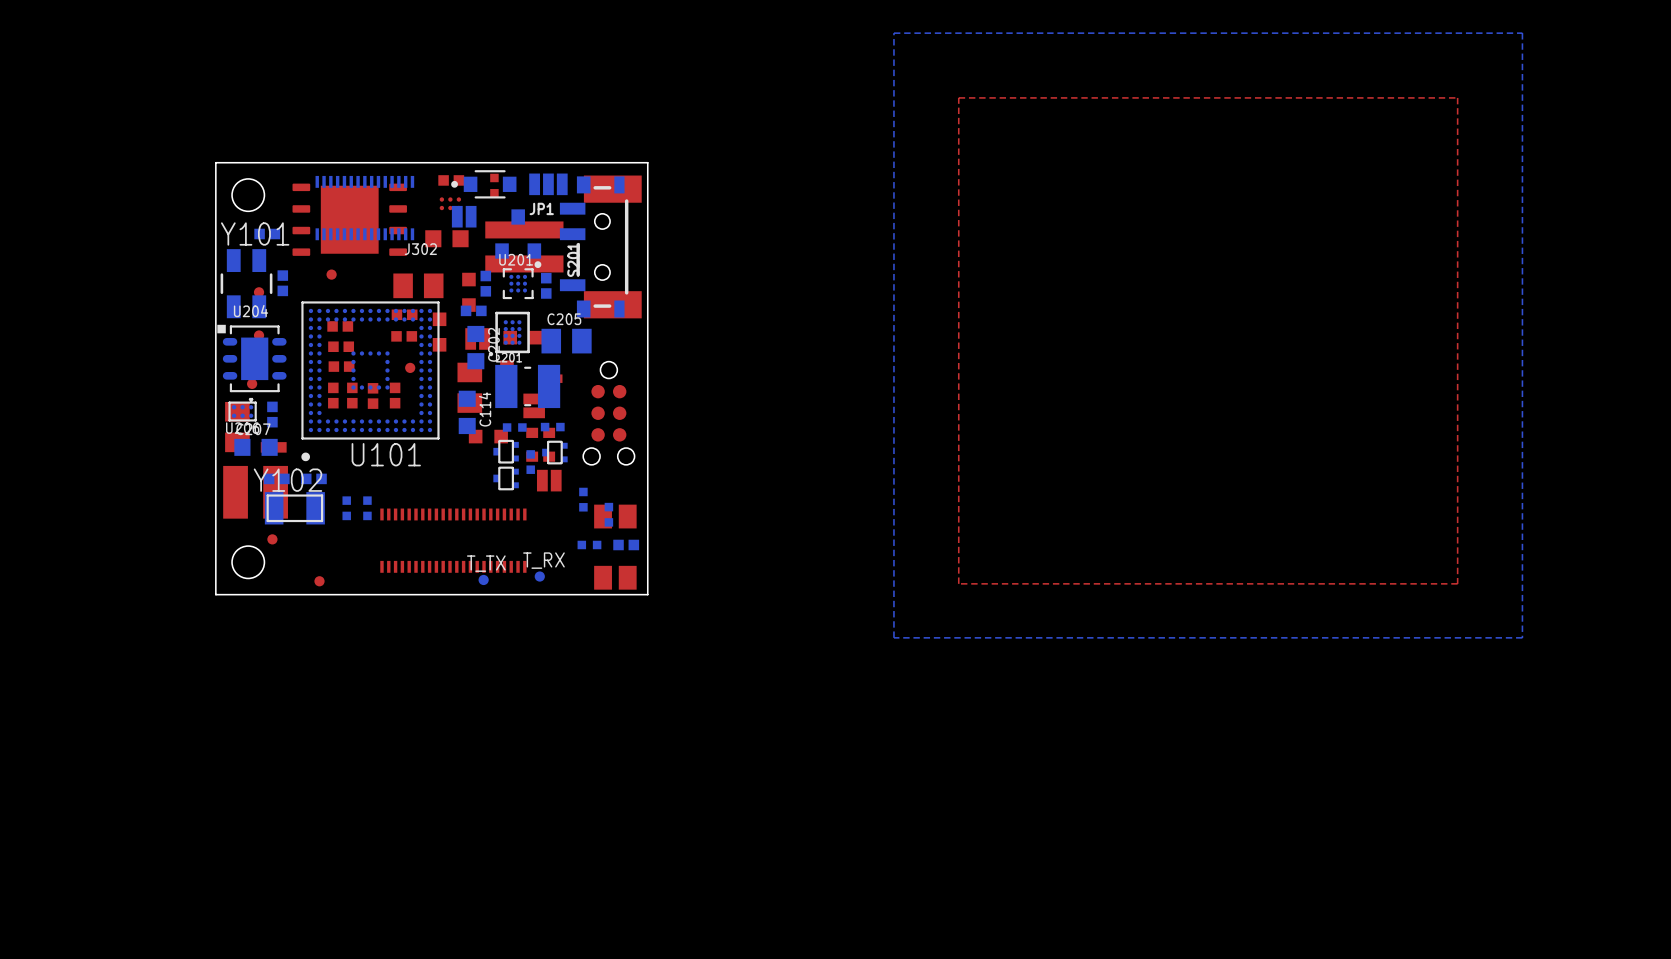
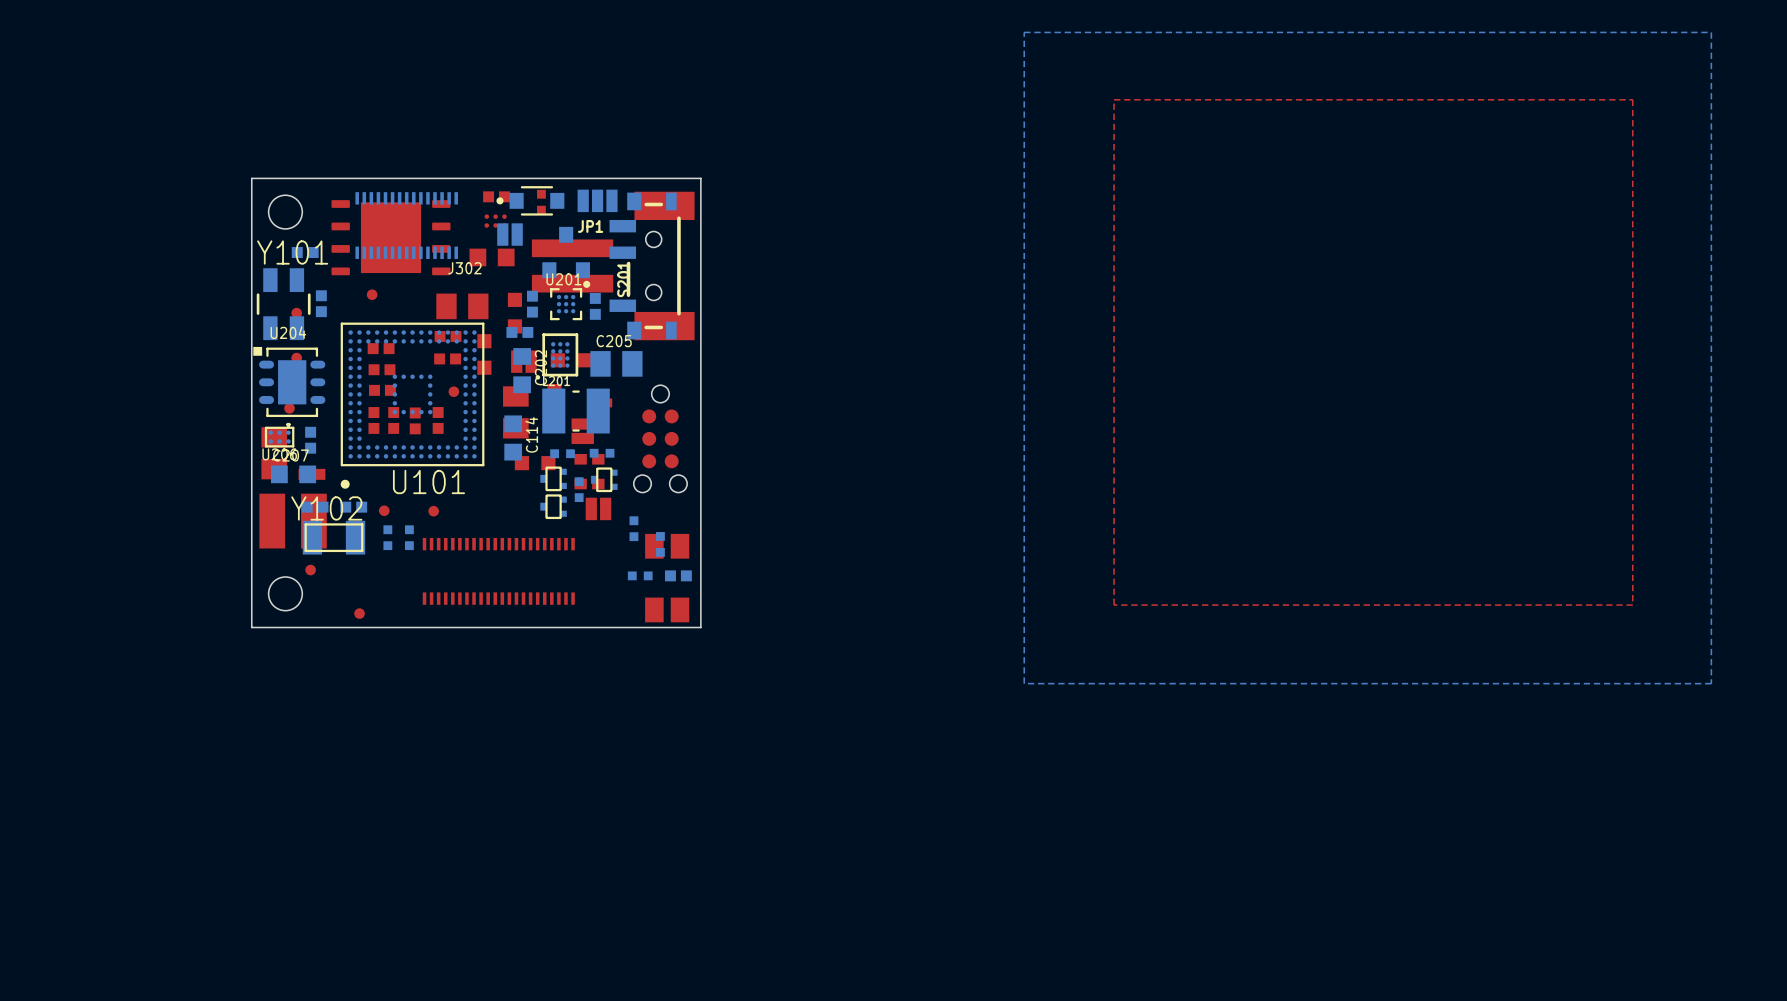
bottom zone outline: (1522, 33) (1522, 637) (893, 637) (893, 33) (1522, 33) -> (1711, 32) (1711, 683) (1024, 683) (1024, 32) (1711, 32)
top zone outline: (1457, 97) (1457, 583) (958, 583) (958, 97) (1457, 97) -> (1632, 99) (1632, 605) (1114, 605) (1114, 99) (1632, 99)
T_RX side: bottom (539, 576) -> top (384, 510)
T_TX side: bottom (483, 579) -> top (433, 511)

